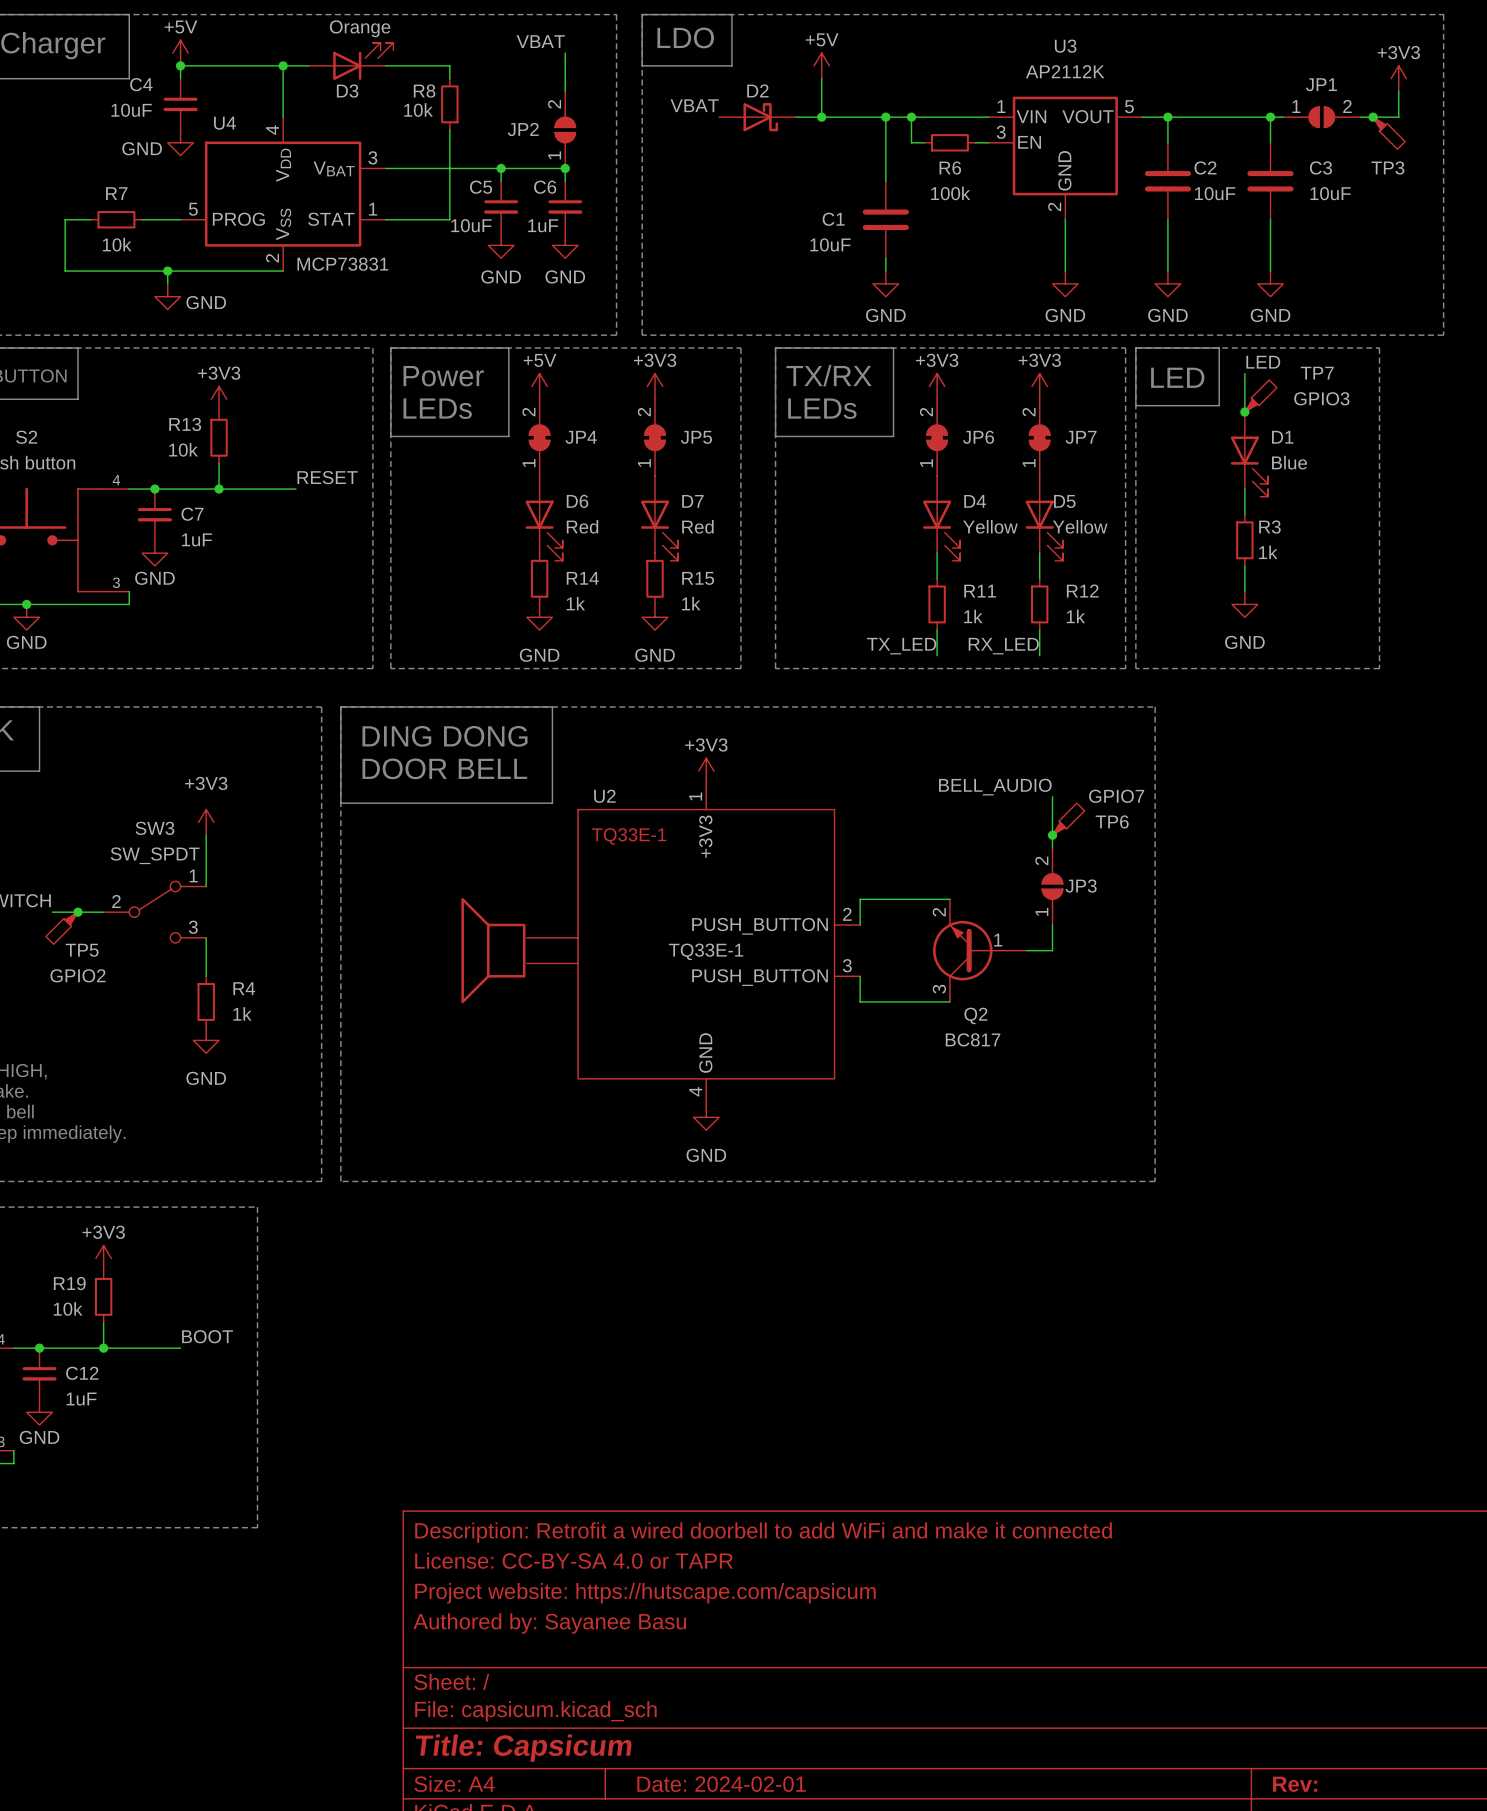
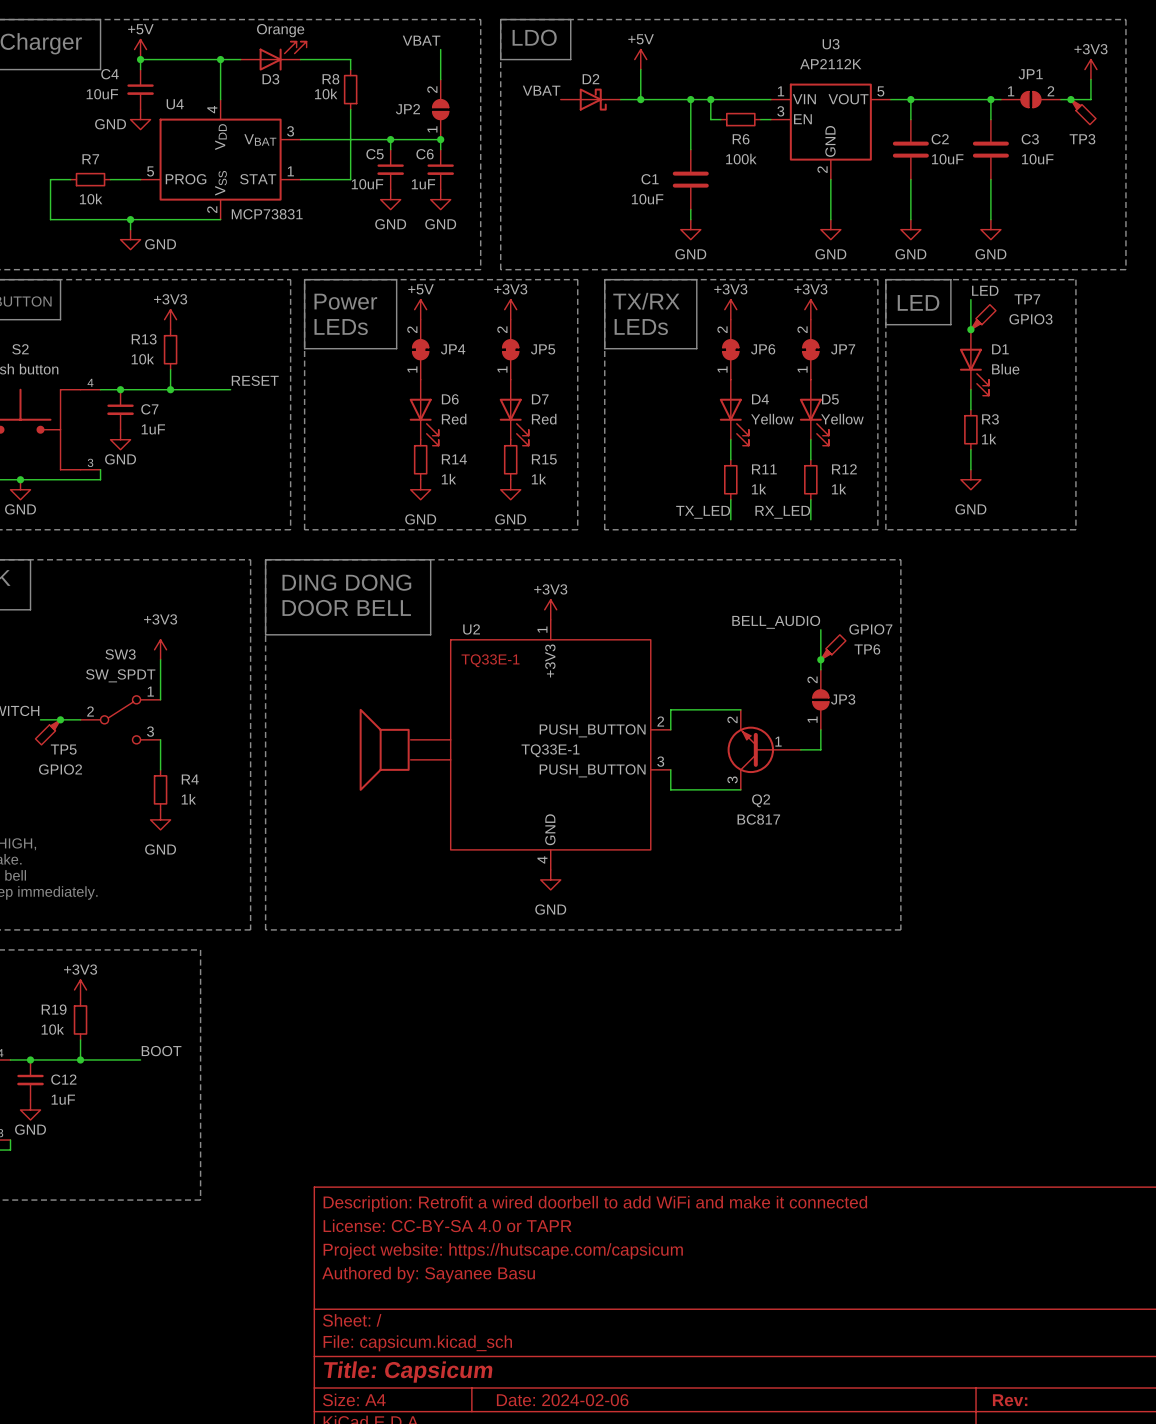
title block: Date: 2024-02-01 (721, 1784) -> Date: 2024-02-06 (562, 1400)

